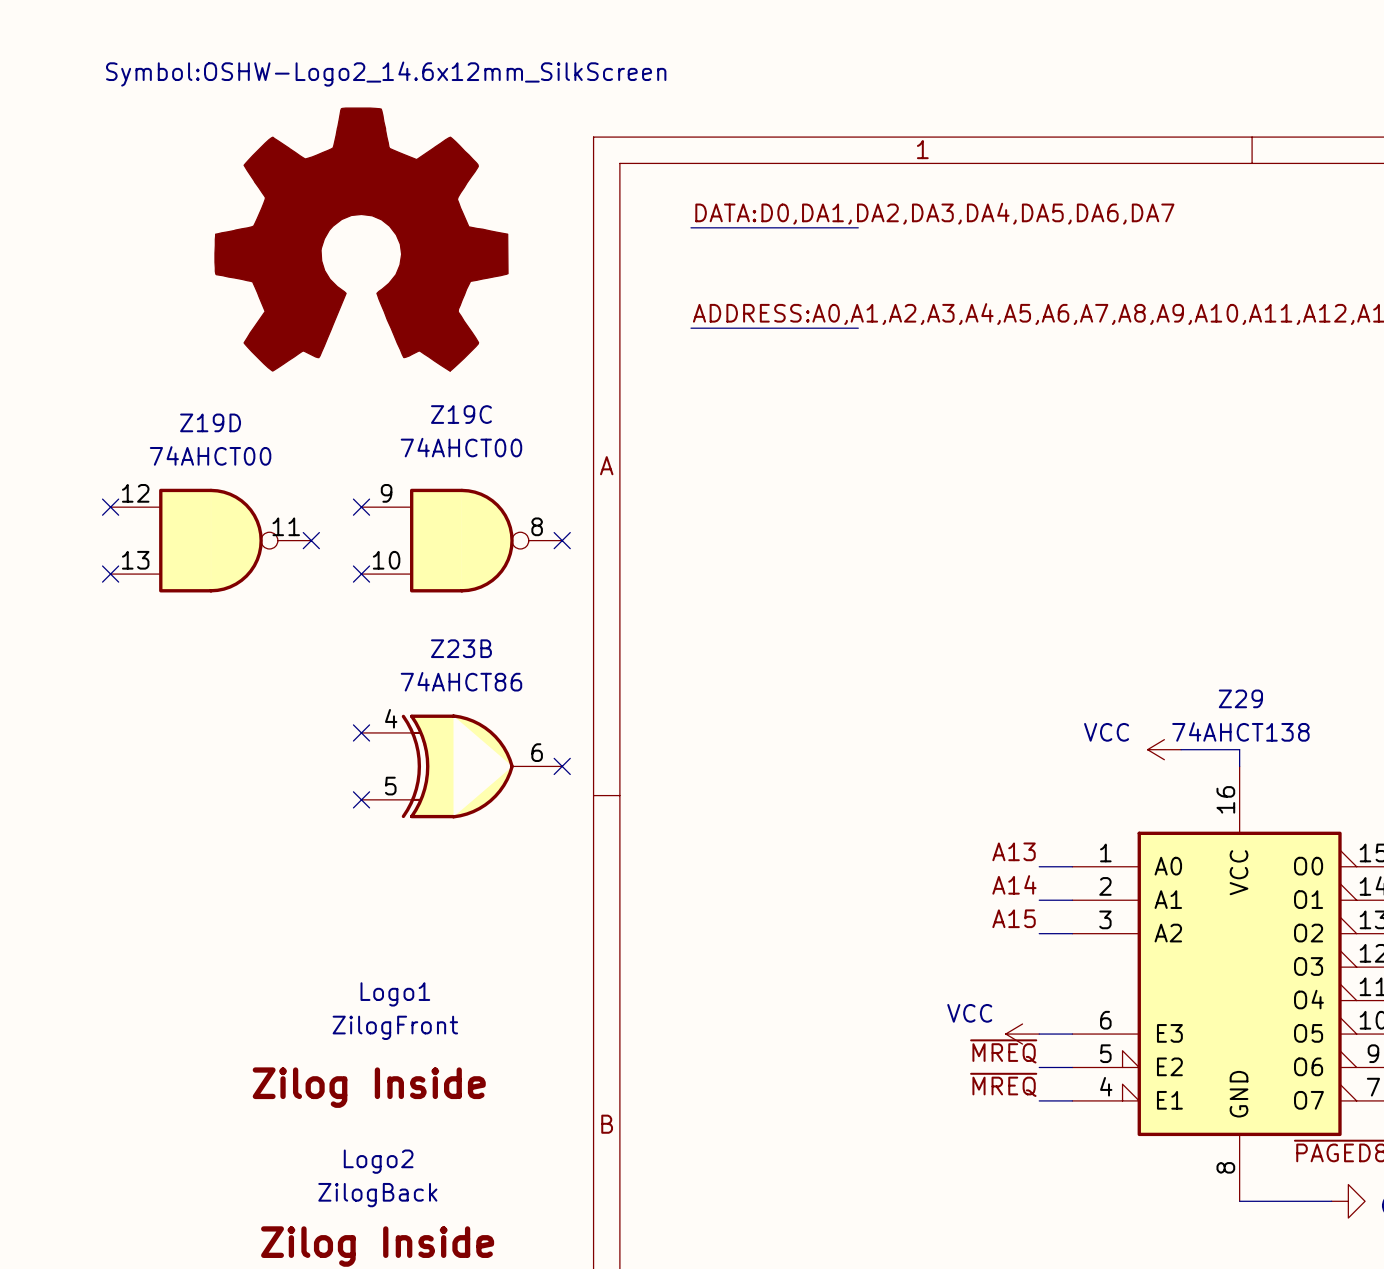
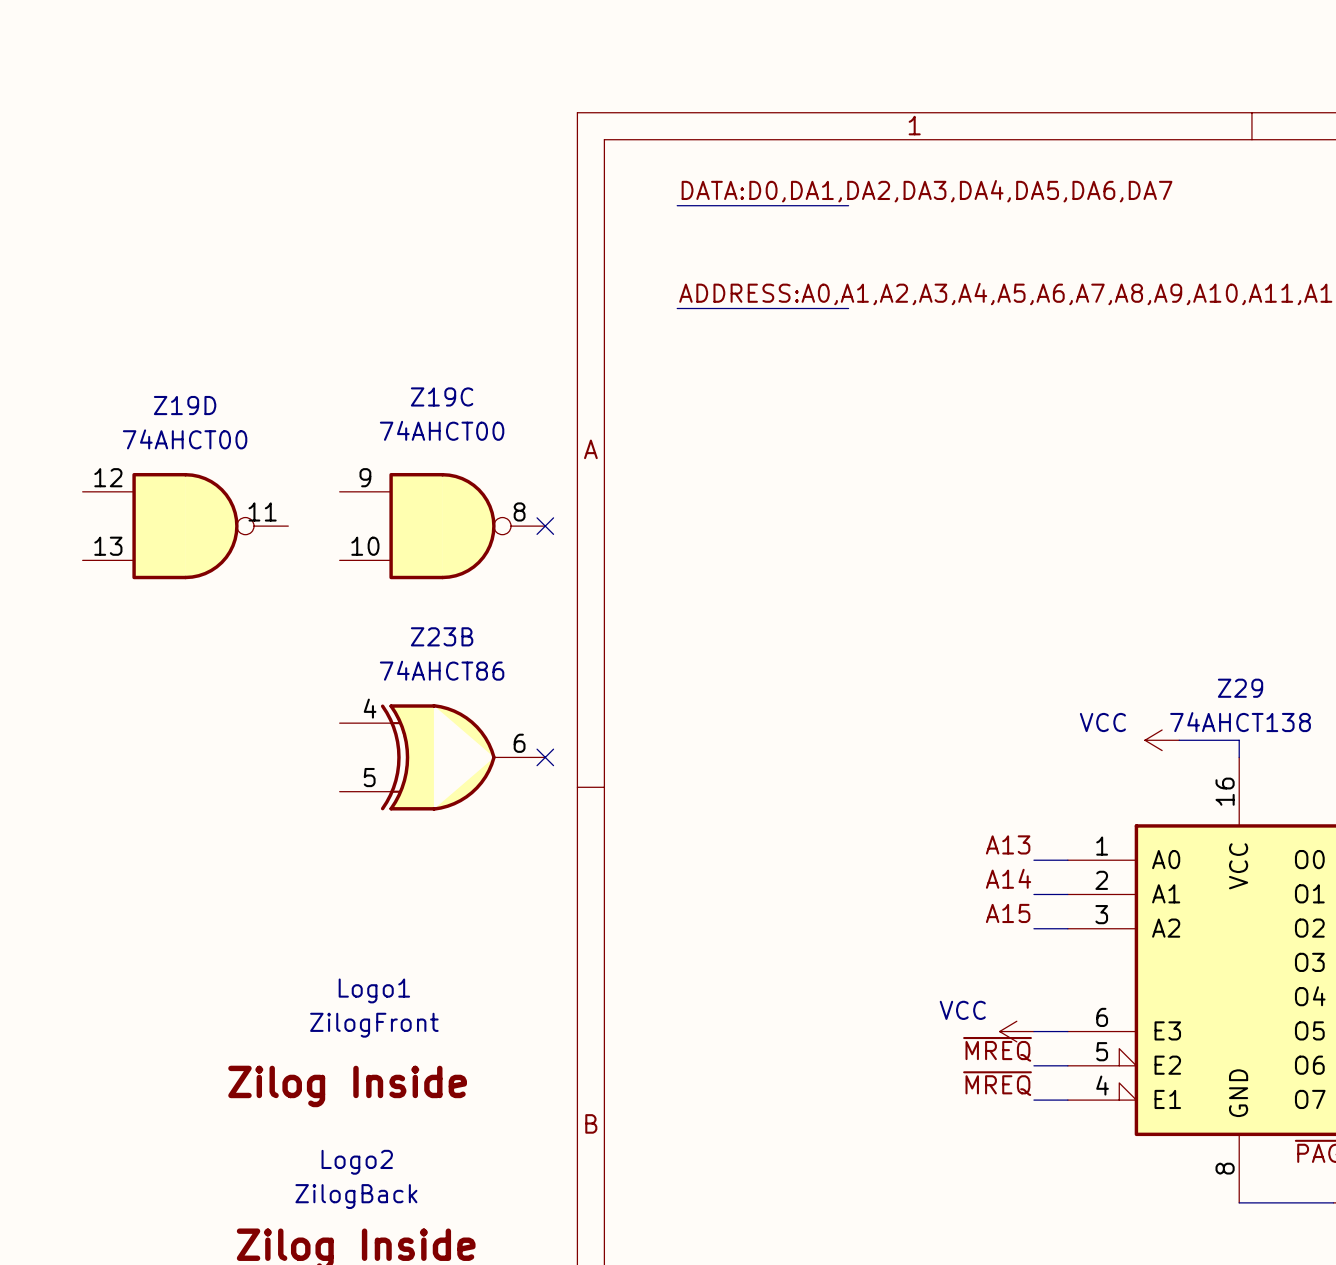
power symbol: (361, 239) -> none
no-connect mark: (110, 507) -> none
no-connect mark: (361, 507) -> none
no-connect mark: (311, 540) -> none
no-connect mark: (110, 574) -> none
no-connect mark: (361, 574) -> none
no-connect mark: (361, 732) -> none
no-connect mark: (361, 799) -> none

